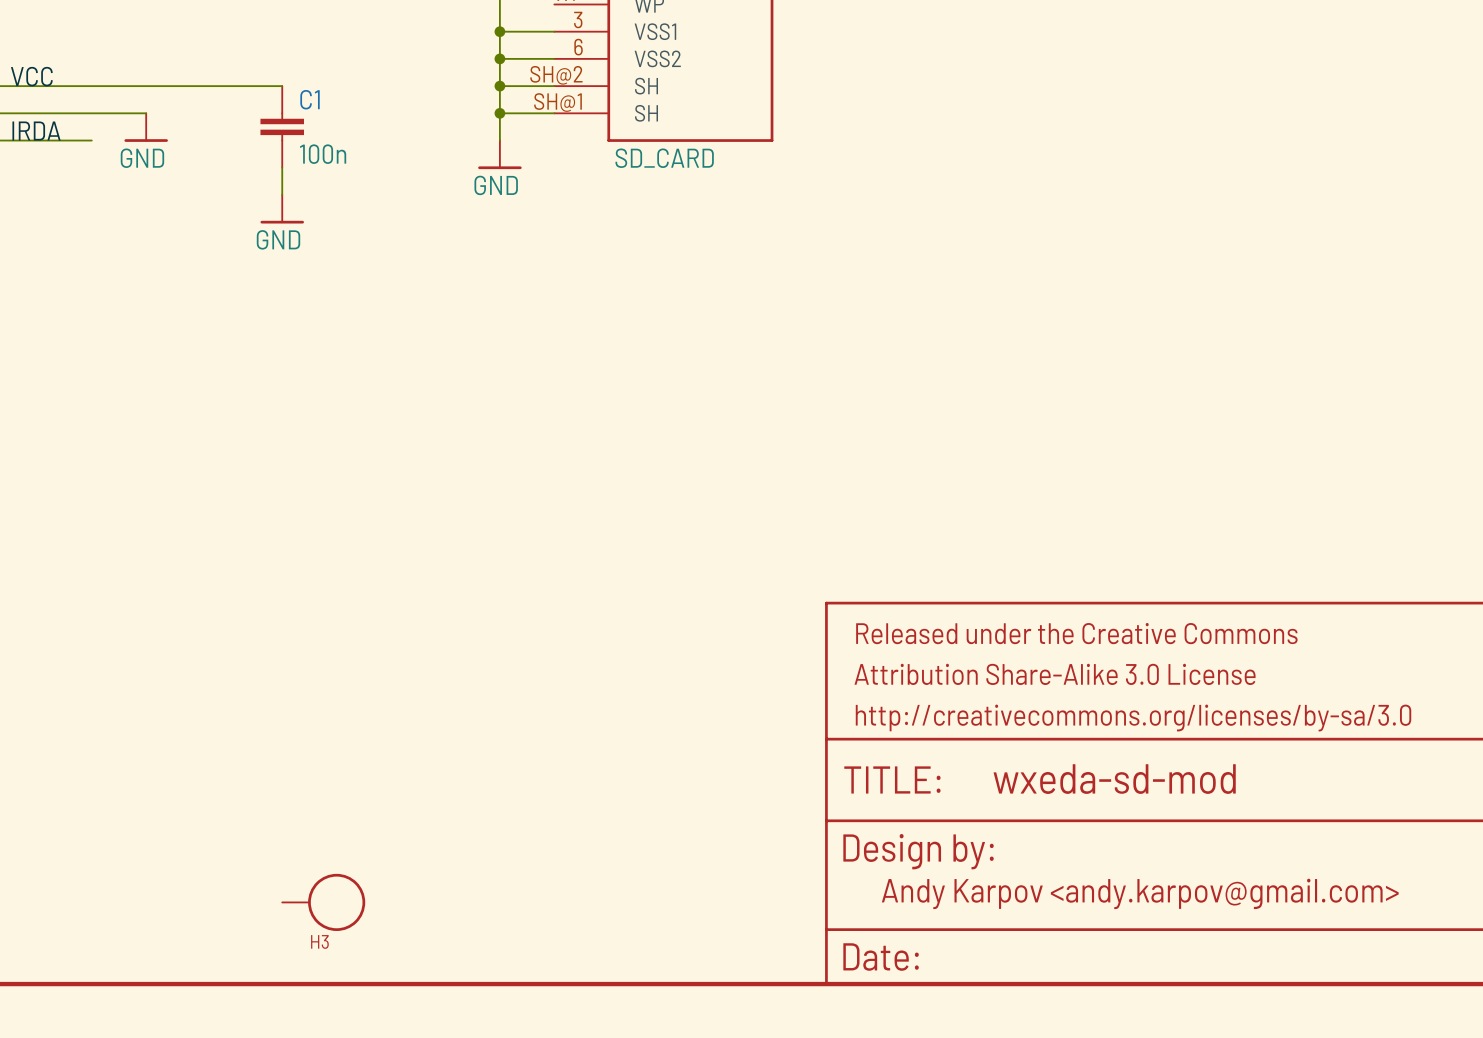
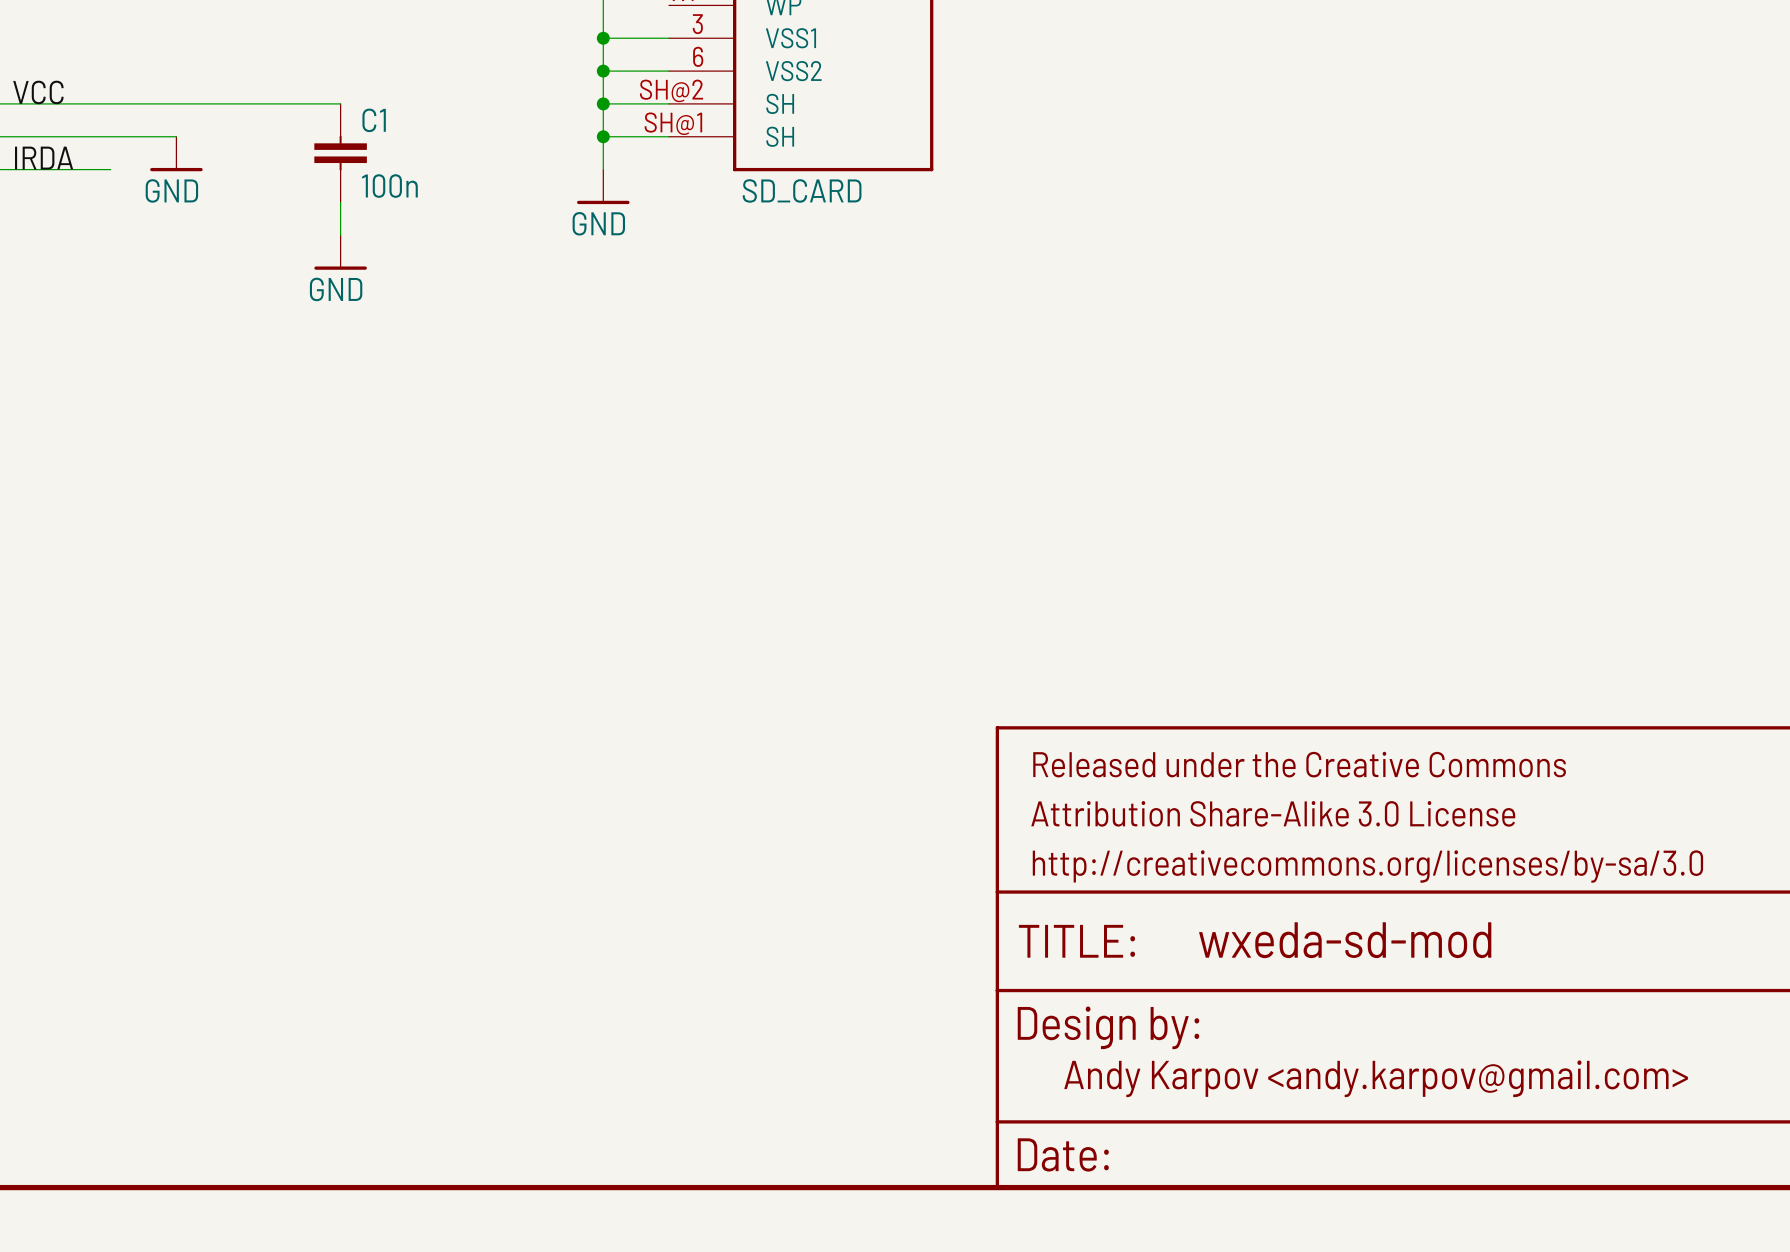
H3: (323, 902) -> none

